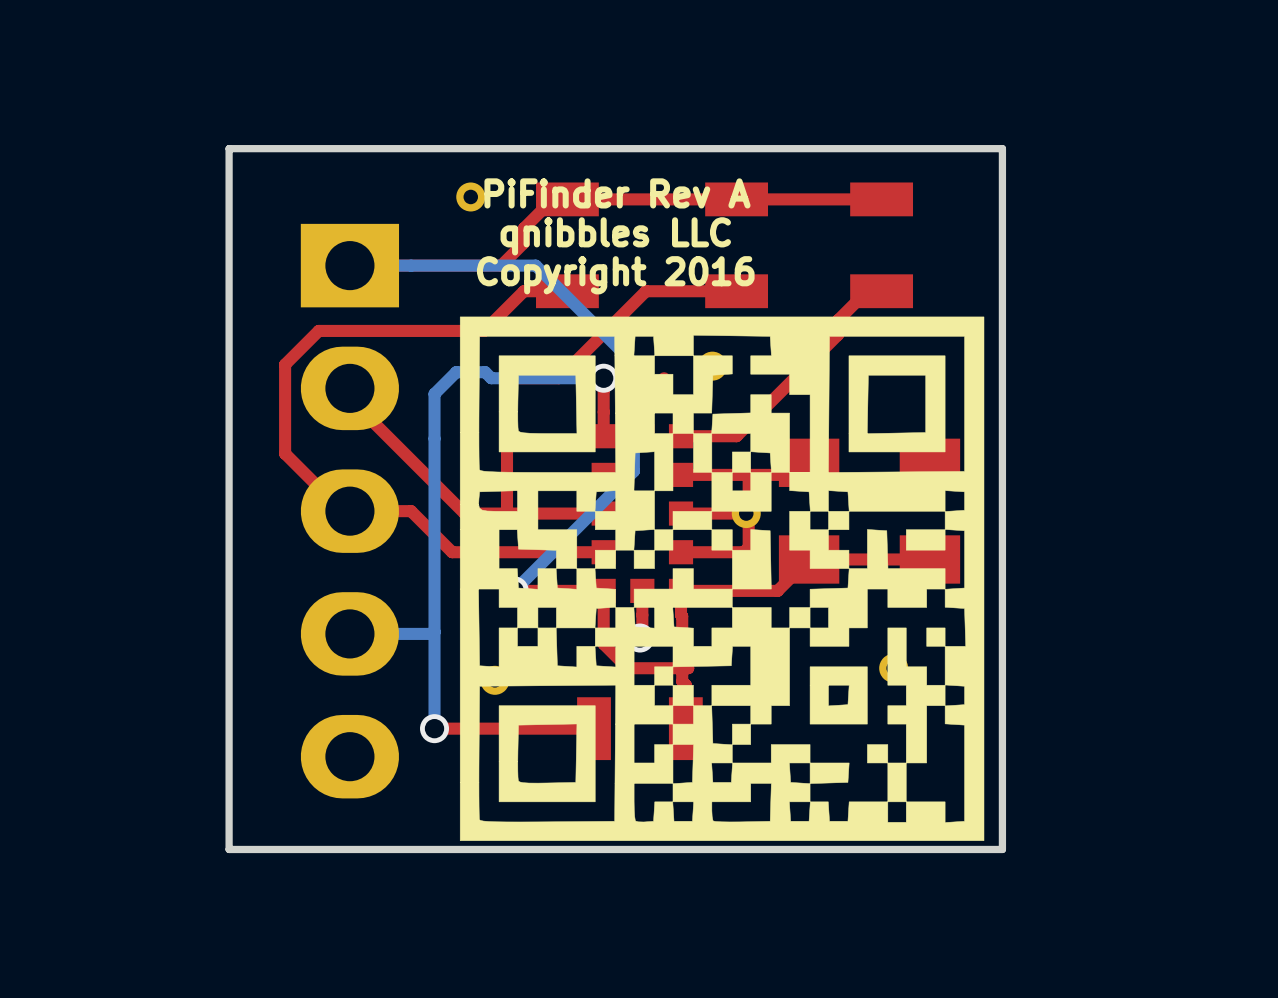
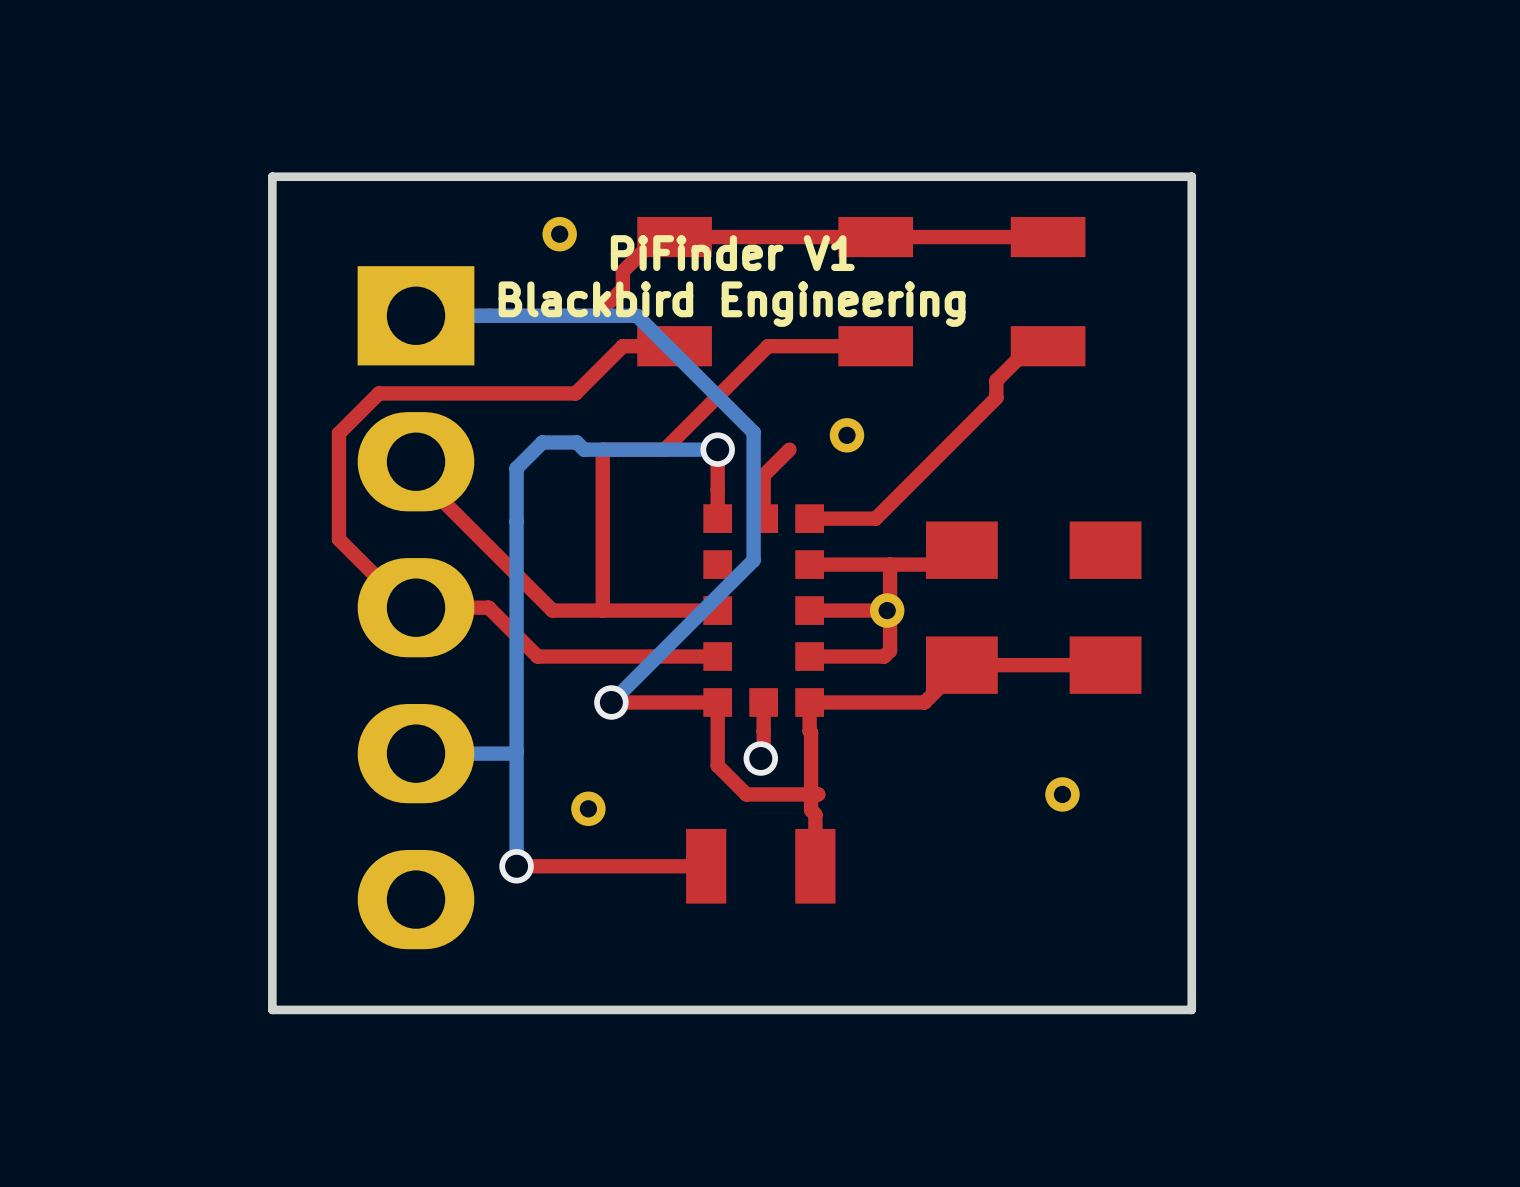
text: PiFinder Rev A (617, 193) -> PiFinder V1 (732, 253)
text: qnibbles LLC (615, 236) -> none
text: none -> Blackbird Engineering (732, 304)
text: Copyright 2016 (615, 275) -> none
drawing: [459, 316, 985, 841] -> none

